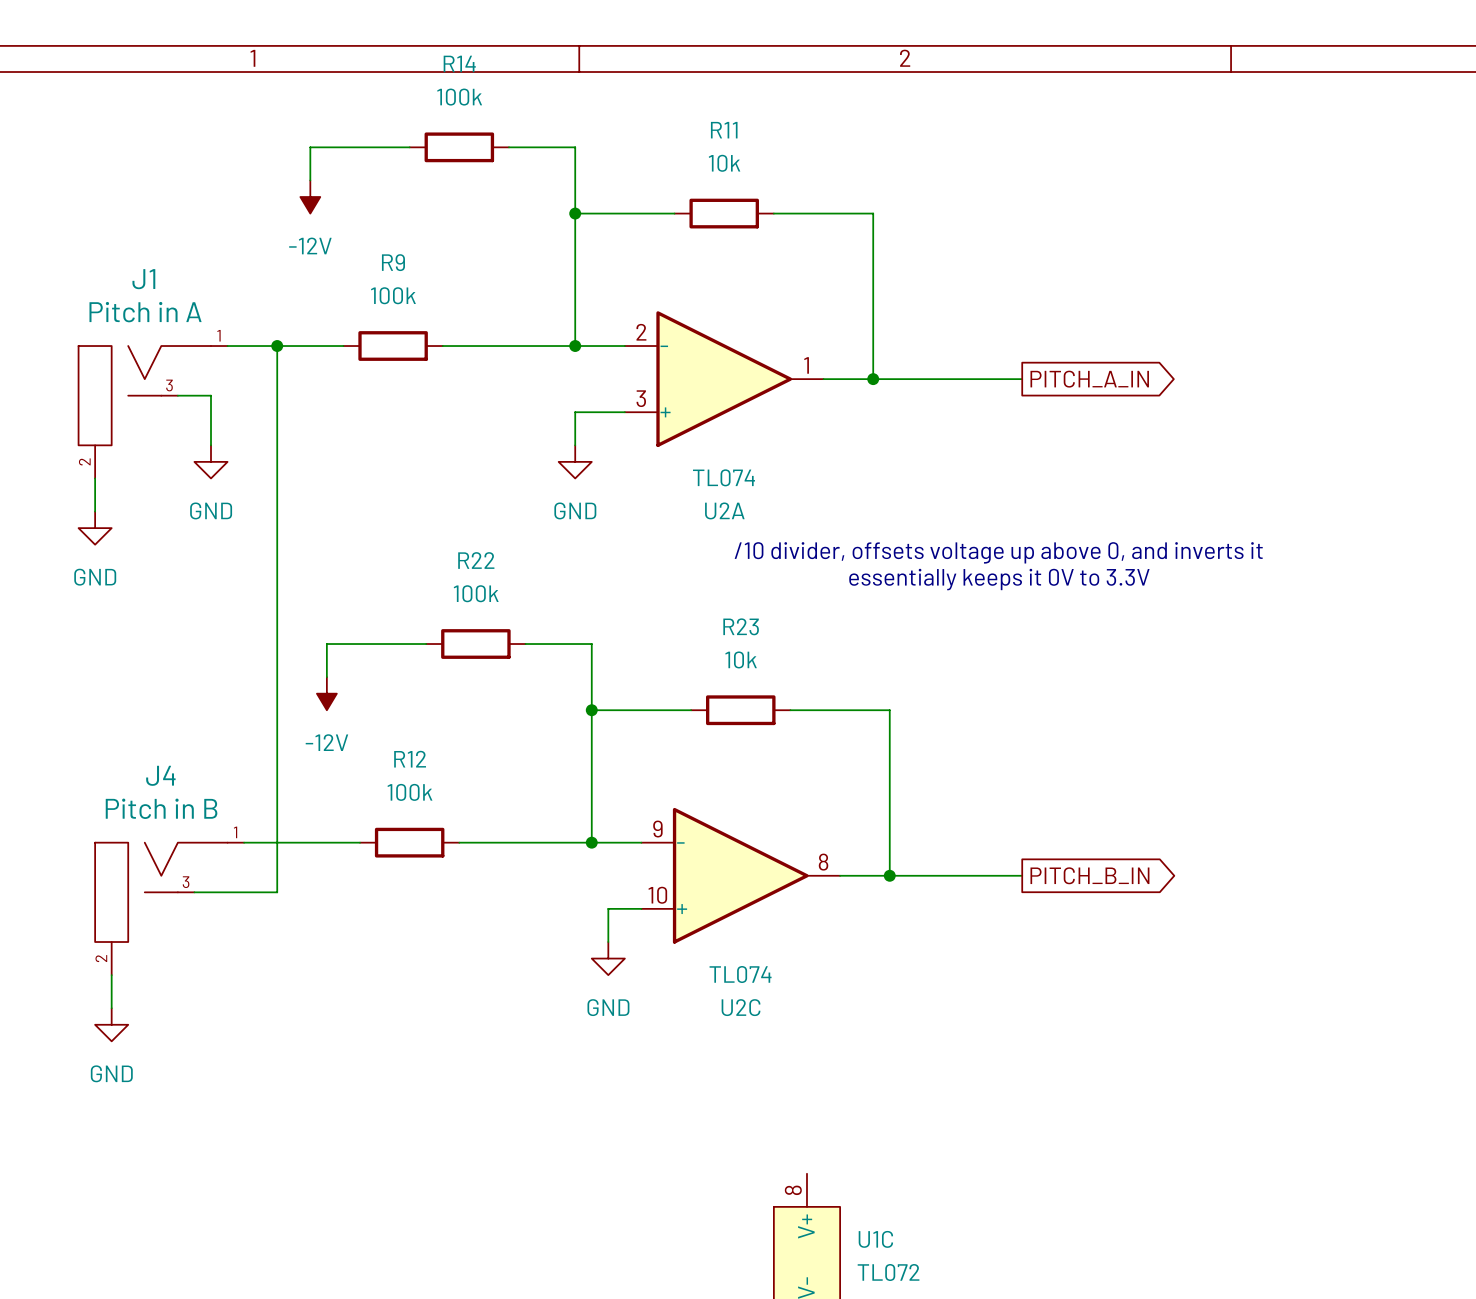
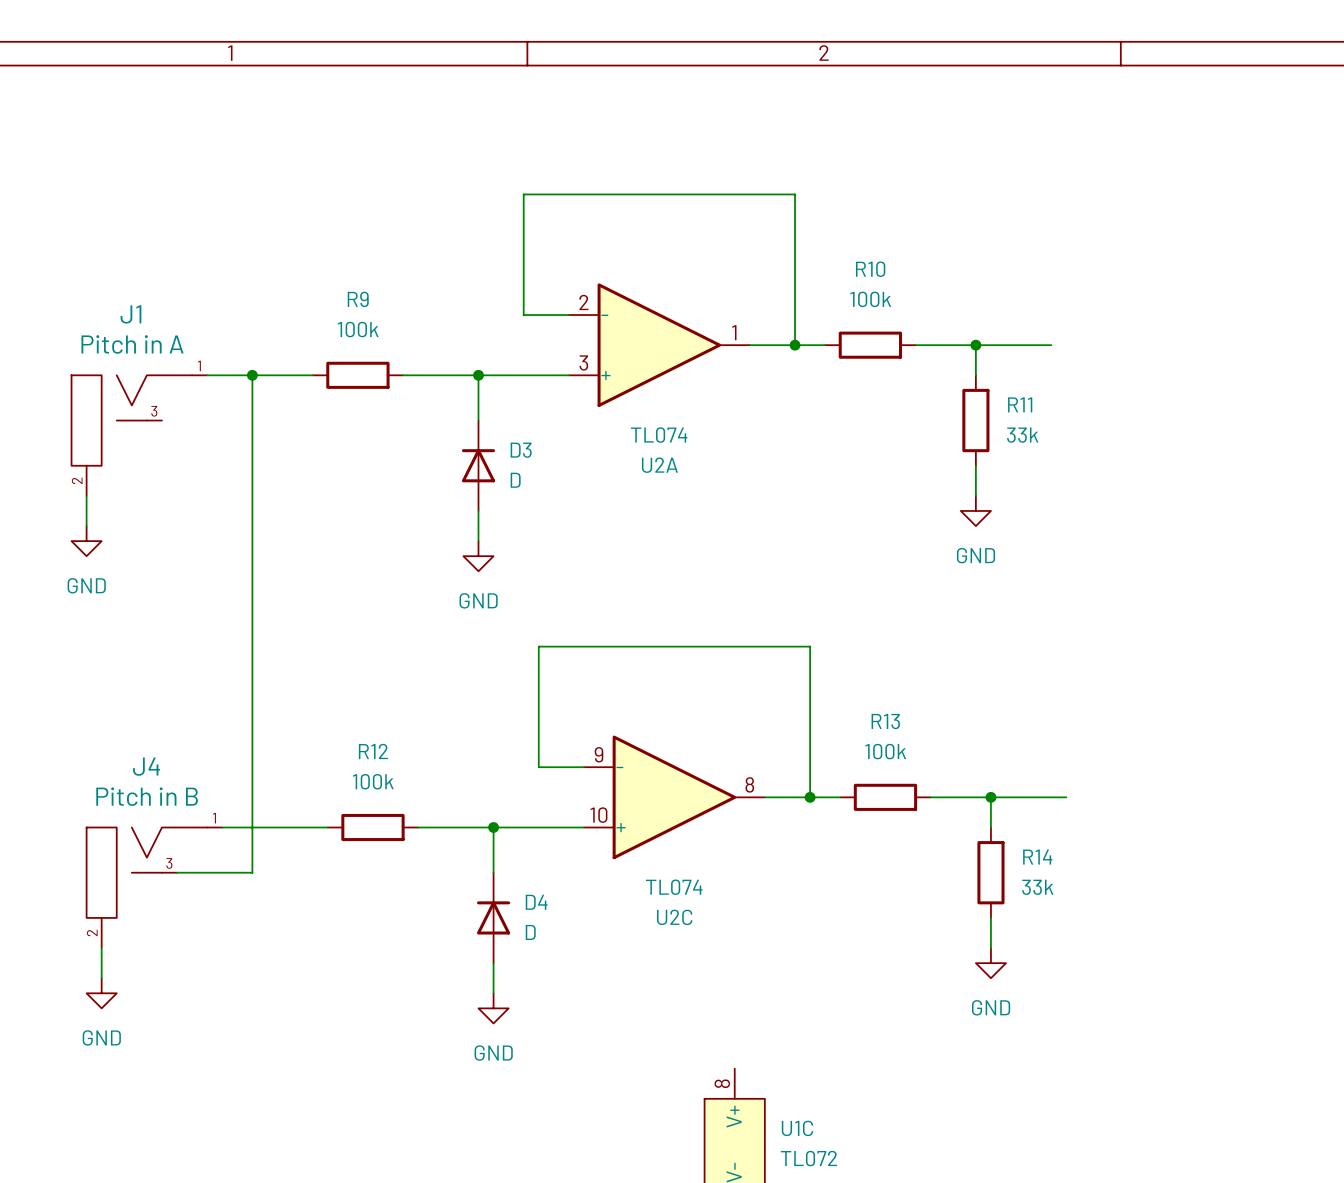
R14 name position: R14 (459, 63) -> R14 (1037, 857)
R14 value: 100k (459, 97) -> 33k (1037, 887)
R11 name position: R11 (724, 130) -> R11 (1020, 404)
wire: (409, 147) (310, 147) (310, 180) -> none
R14 rotation: 0° (459, 147) -> 90° clockwise (990, 872)
R14 position: (459, 147) -> (990, 872)
wire: (508, 147) (575, 147) (575, 213) -> none
R11 value: 10k (724, 163) -> 33k (1022, 435)
power symbol: -12V (310, 197) -> none
junction: (575, 213) -> none
R11 rotation: 0° (724, 213) -> 90° clockwise (975, 420)
R11 position: (724, 213) -> (975, 420)
wire: (227, 346) (343, 346) -> (207, 375) (312, 375)
wire: (277, 346) (277, 412) -> none
junction position: (277, 346) -> (252, 375)
R9 position: (393, 346) -> (357, 375)
wire: (442, 346) (575, 346) -> none
junction: (575, 346) -> none
wire: (906, 379) (1005, 379) -> (614, 194) (704, 194)
R10: none -> 100k (870, 345)
wire: none -> (930, 345) (1051, 345)
wire: none -> (975, 345) (975, 375)
junction: none -> (975, 345)
global label: PITCH_A_IN (1089, 379) -> none
wire: (177, 395) (211, 395) (211, 445) -> none
J1 position: (153, 412) -> (139, 435)
wire: none -> (478, 375) (478, 420)
junction: none -> (478, 375)
wire: (575, 412) (575, 445) -> (523, 375) (403, 375)
power symbol: GND (211, 461) -> none
power symbol position: GND (575, 461) -> GND (478, 556)
wire: (95, 478) (95, 511) -> (86, 495) (86, 526)
D3: none -> D (478, 465)
wire: none -> (975, 465) (975, 495)
power symbol position: GND (95, 528) -> GND (86, 541)
text: /10 divider, offsets voltage up above 0, and inverts it (998, 552) -> none
wire: none -> (478, 510) (478, 541)
power symbol: none -> GND (975, 510)
text: essentially keeps it 0V to 3.3V (999, 579) -> none
wire: (426, 644) (326, 644) (326, 677) -> none
R22: 100k (475, 644) -> none
wire: (525, 644) (591, 644) (591, 710) -> none
power symbol: -12V (326, 693) -> none
junction: (591, 710) -> none
wire: none -> (629, 646) (719, 646)
R23: 10k (740, 710) -> none
wire: (244, 842) (360, 842) -> (222, 827) (327, 827)
R12 position: (409, 842) -> (372, 827)
wire: (459, 842) (591, 842) -> none
junction: (591, 842) -> none
wire: (922, 875) (1022, 875) -> (1066, 797) (930, 797)
R13: none -> 100k (885, 797)
wire: none -> (990, 797) (990, 827)
junction: none -> (990, 797)
global label: PITCH_B_IN (1089, 875) -> none
wire: (194, 892) (277, 892) -> (177, 872) (252, 872) (252, 812)
J4 position: (169, 908) -> (154, 887)
wire: none -> (493, 827) (493, 872)
junction: none -> (493, 827)
wire: (608, 908) (608, 942) -> (553, 827) (418, 827)
power symbol position: GND (608, 958) -> GND (493, 1008)
wire: (111, 975) (111, 1008) -> (101, 948) (101, 978)
D4: none -> D (493, 917)
wire: none -> (990, 917) (990, 948)
power symbol position: GND (111, 1024) -> GND (101, 993)
wire: none -> (493, 963) (493, 993)
power symbol: none -> GND (990, 963)

